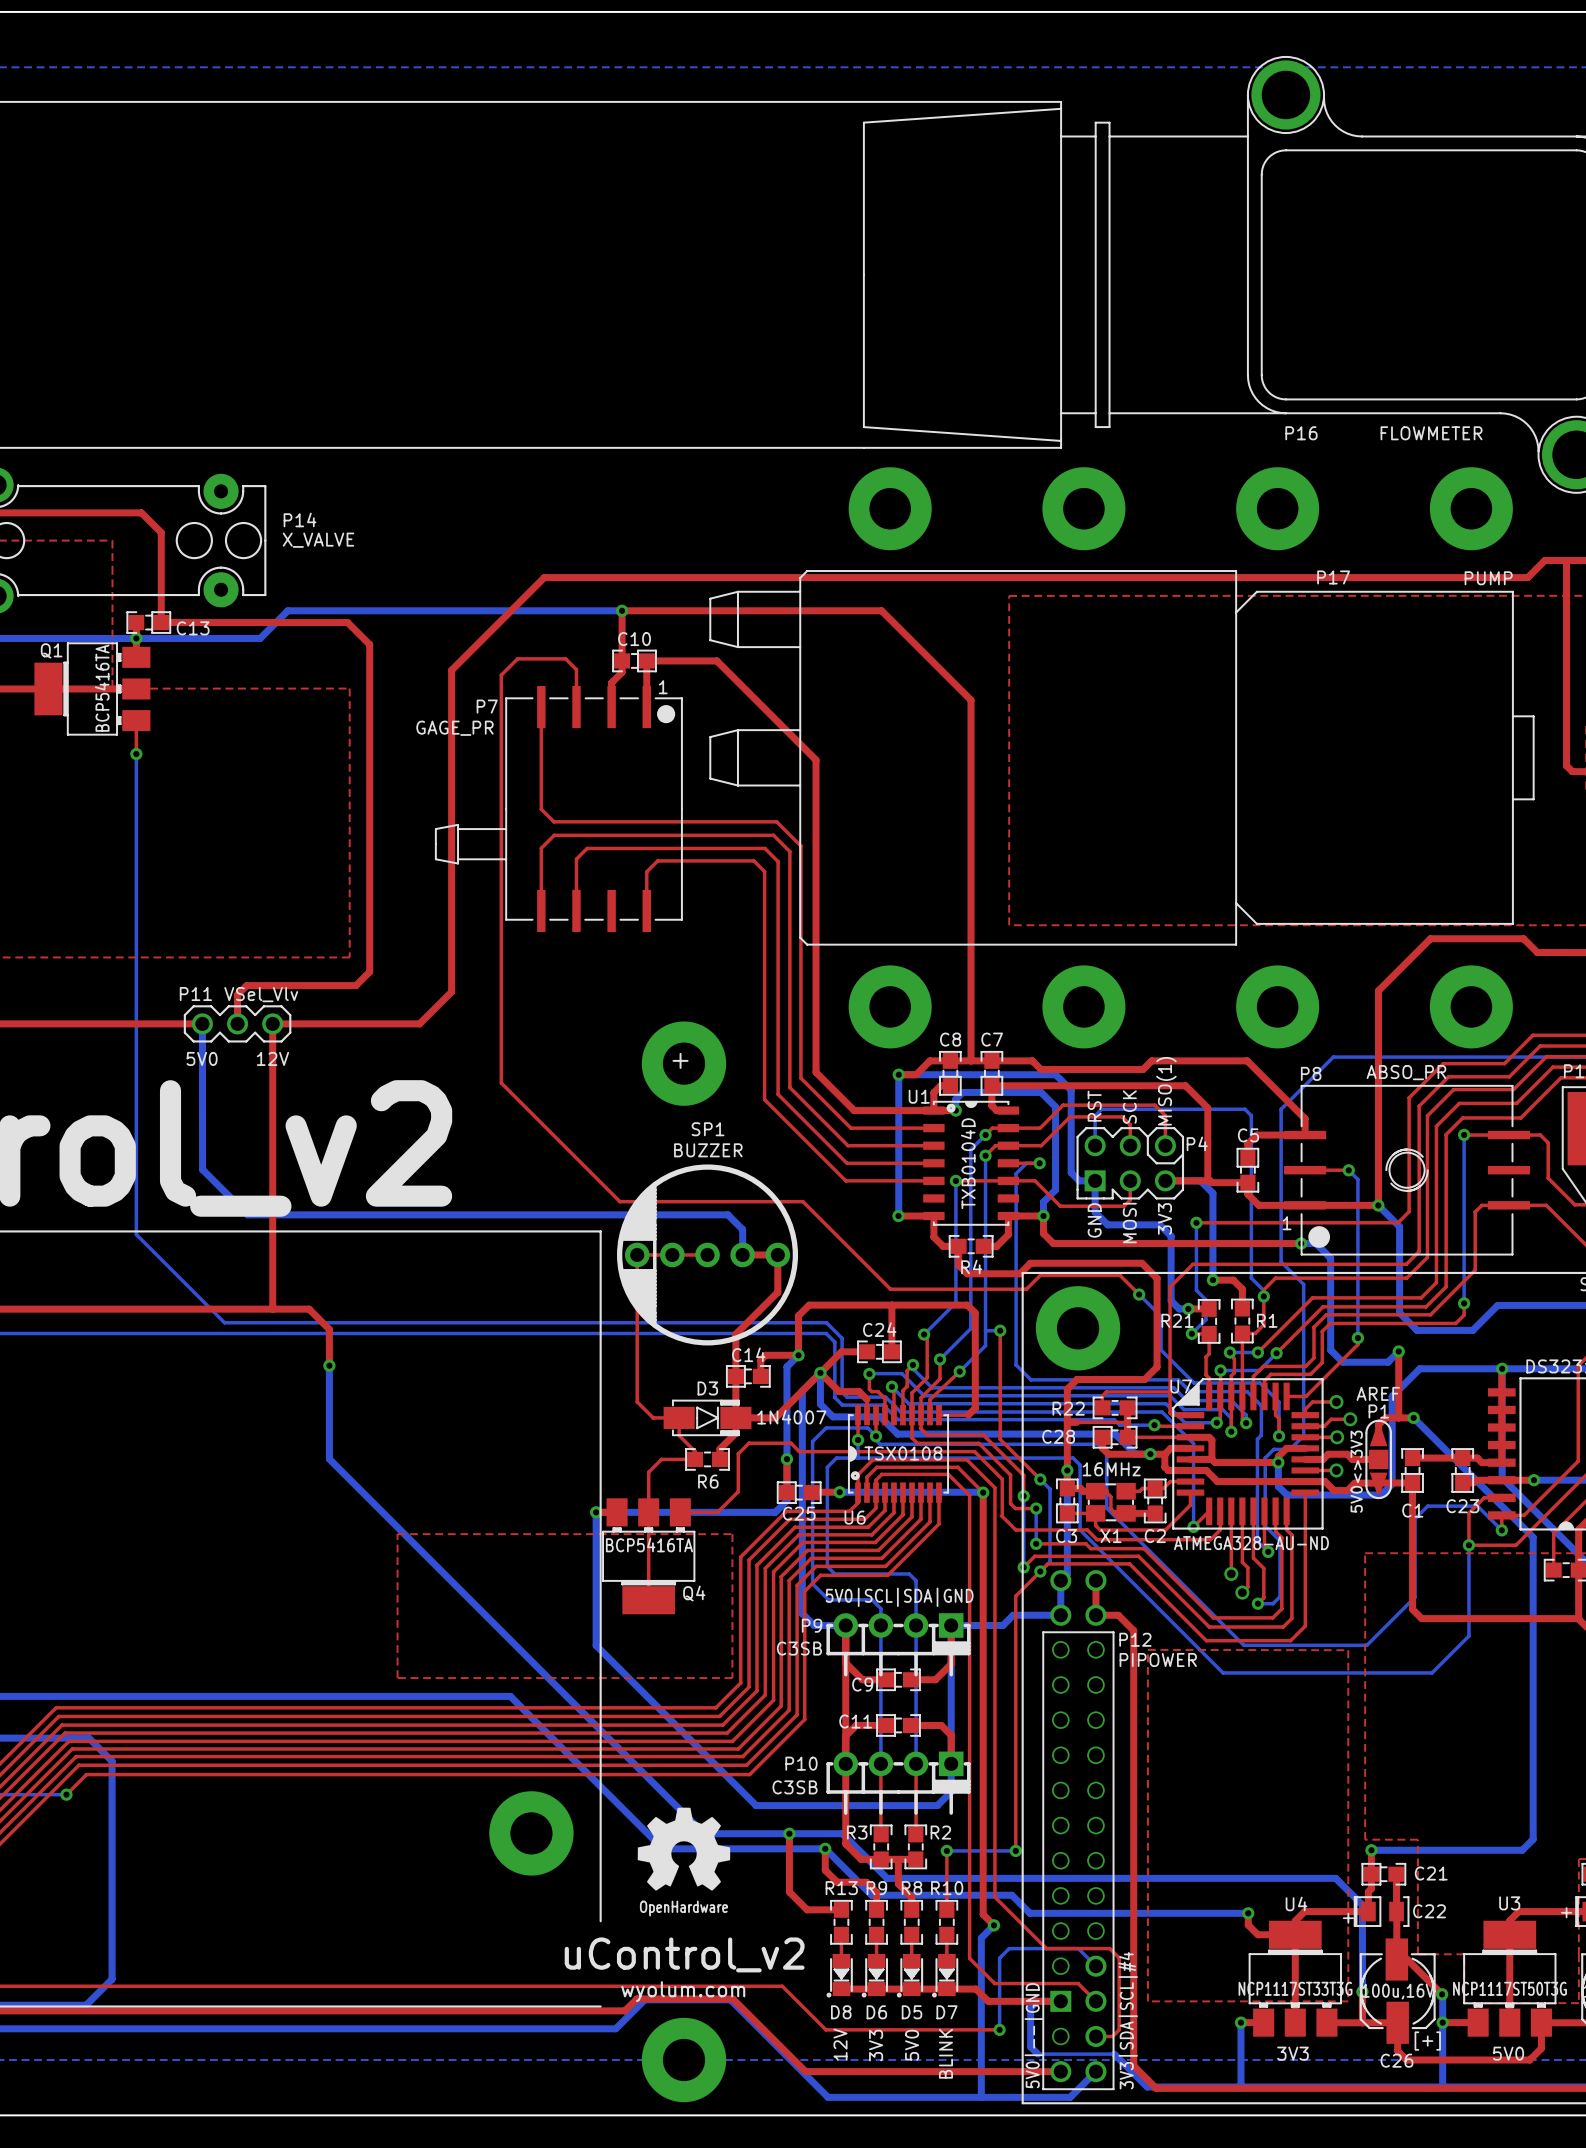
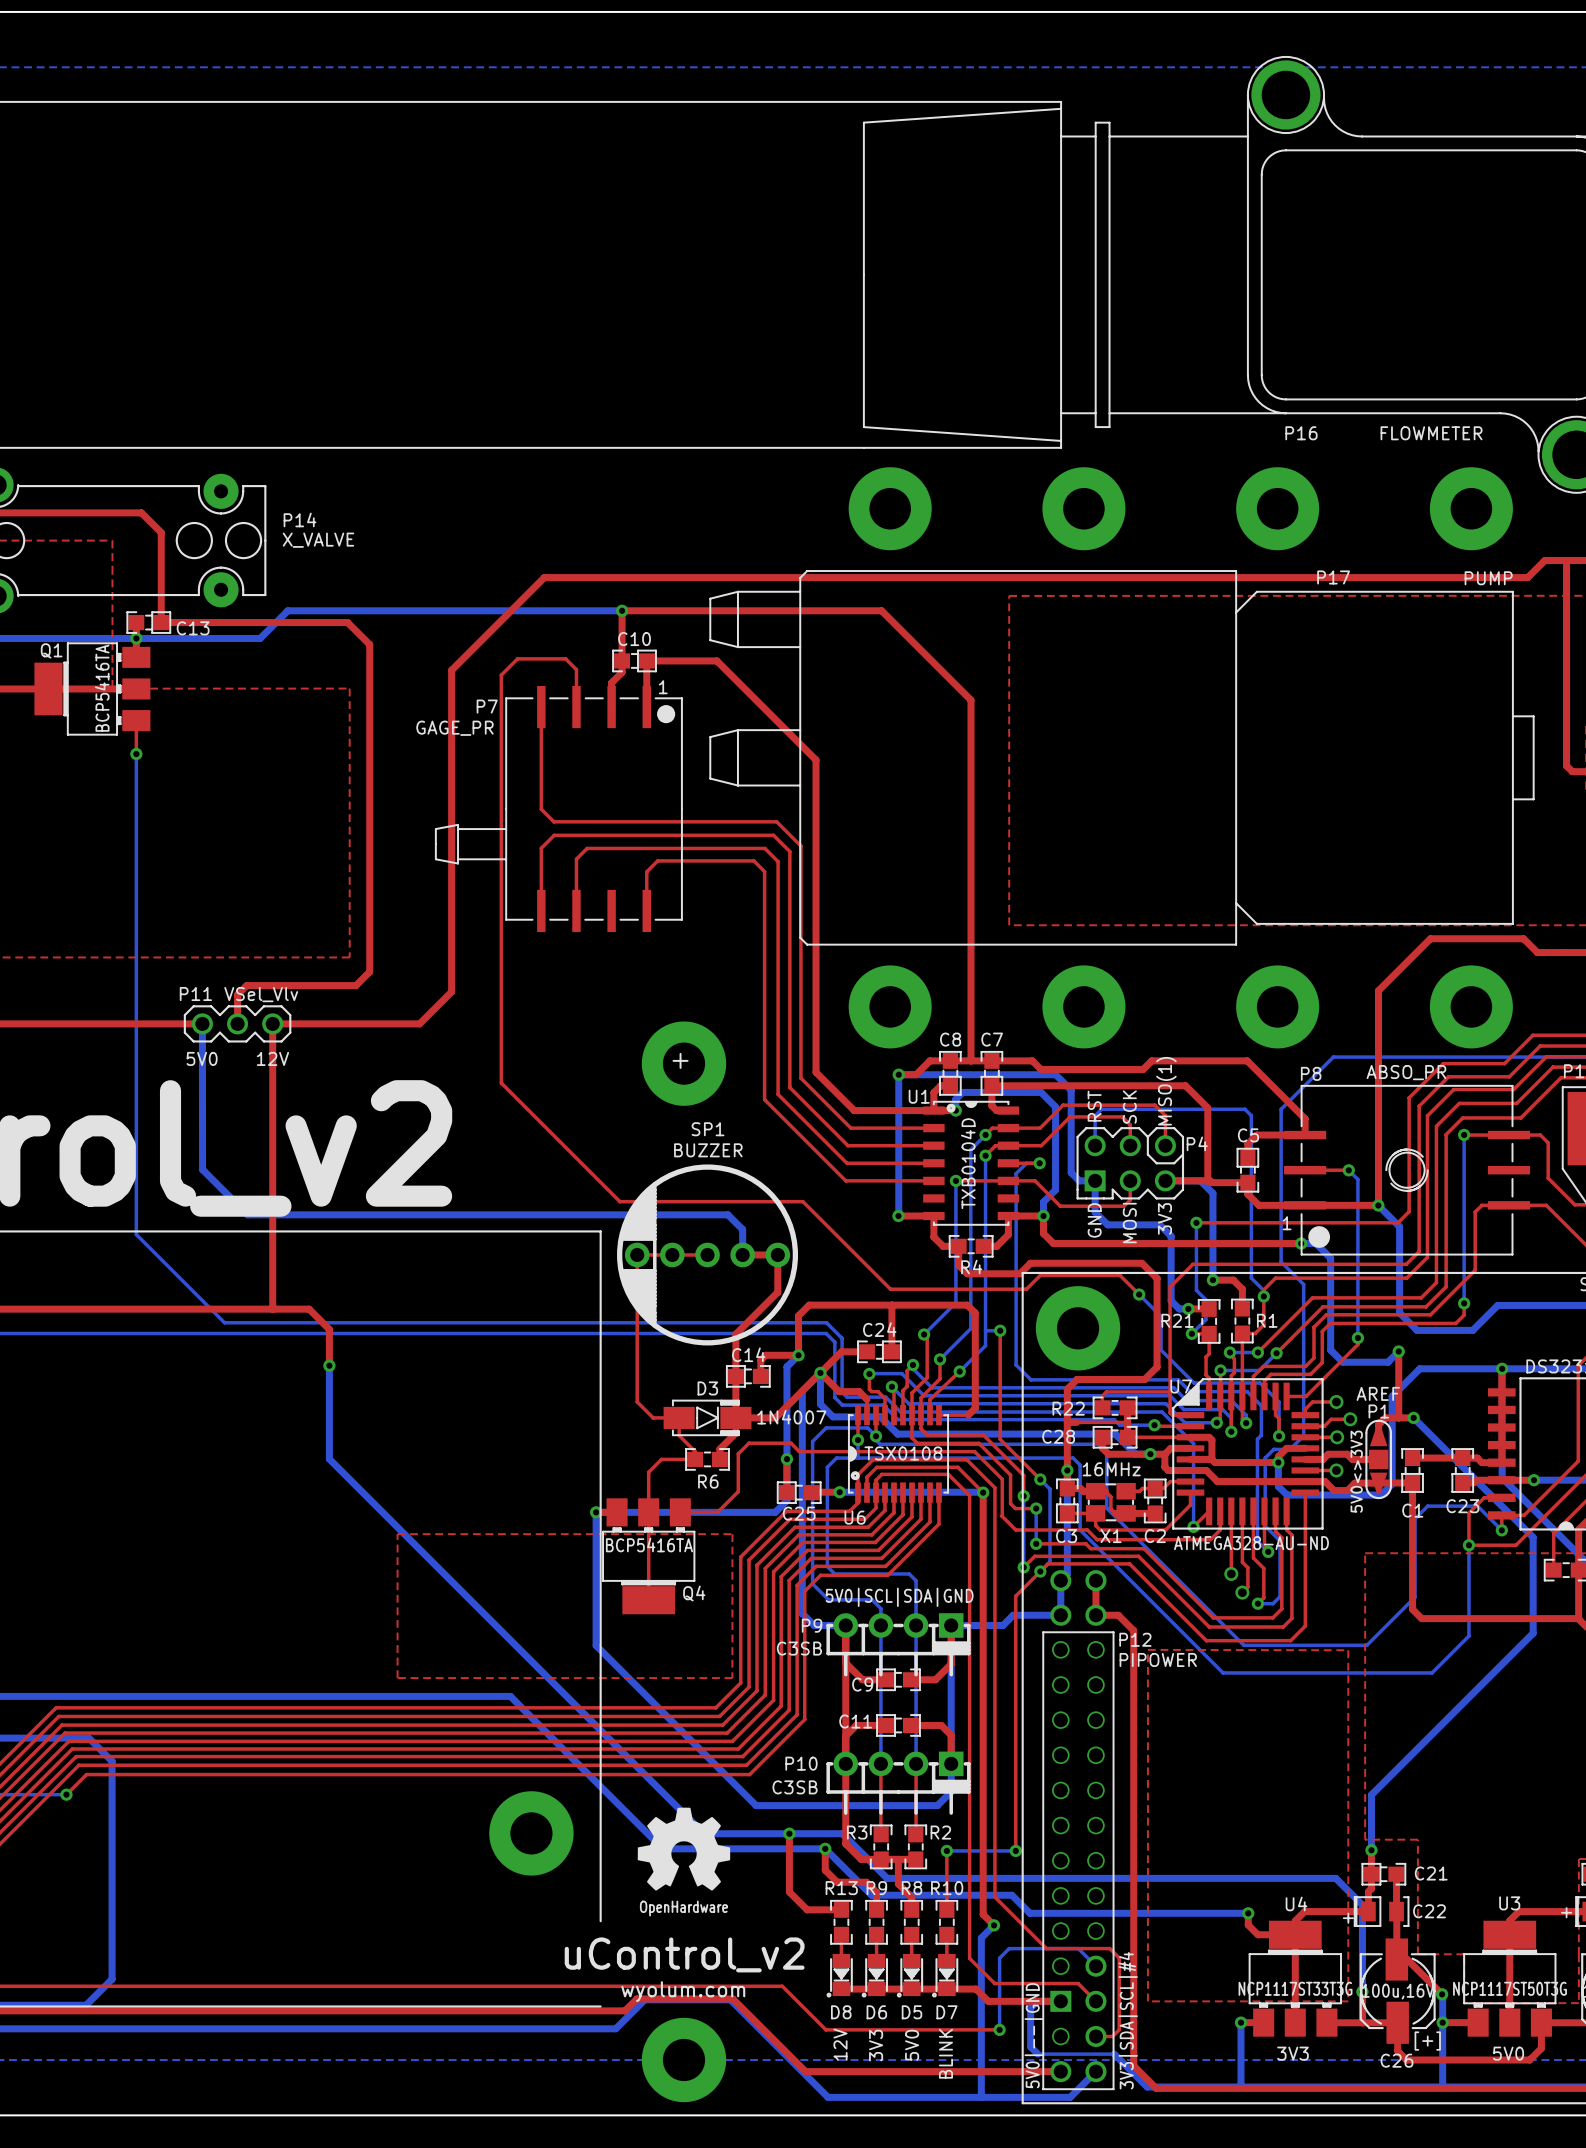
bottom track: (1533, 1633) (1533, 1839) (1522, 1850) (1371, 1850) -> (1533, 1633) (1371, 1794) (1371, 1850)

